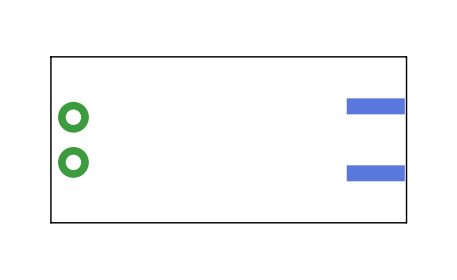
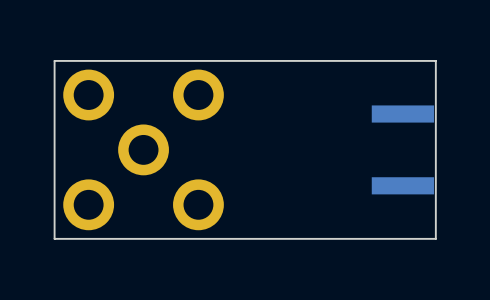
part: (73, 139) -> none
part: none -> (143, 149)

